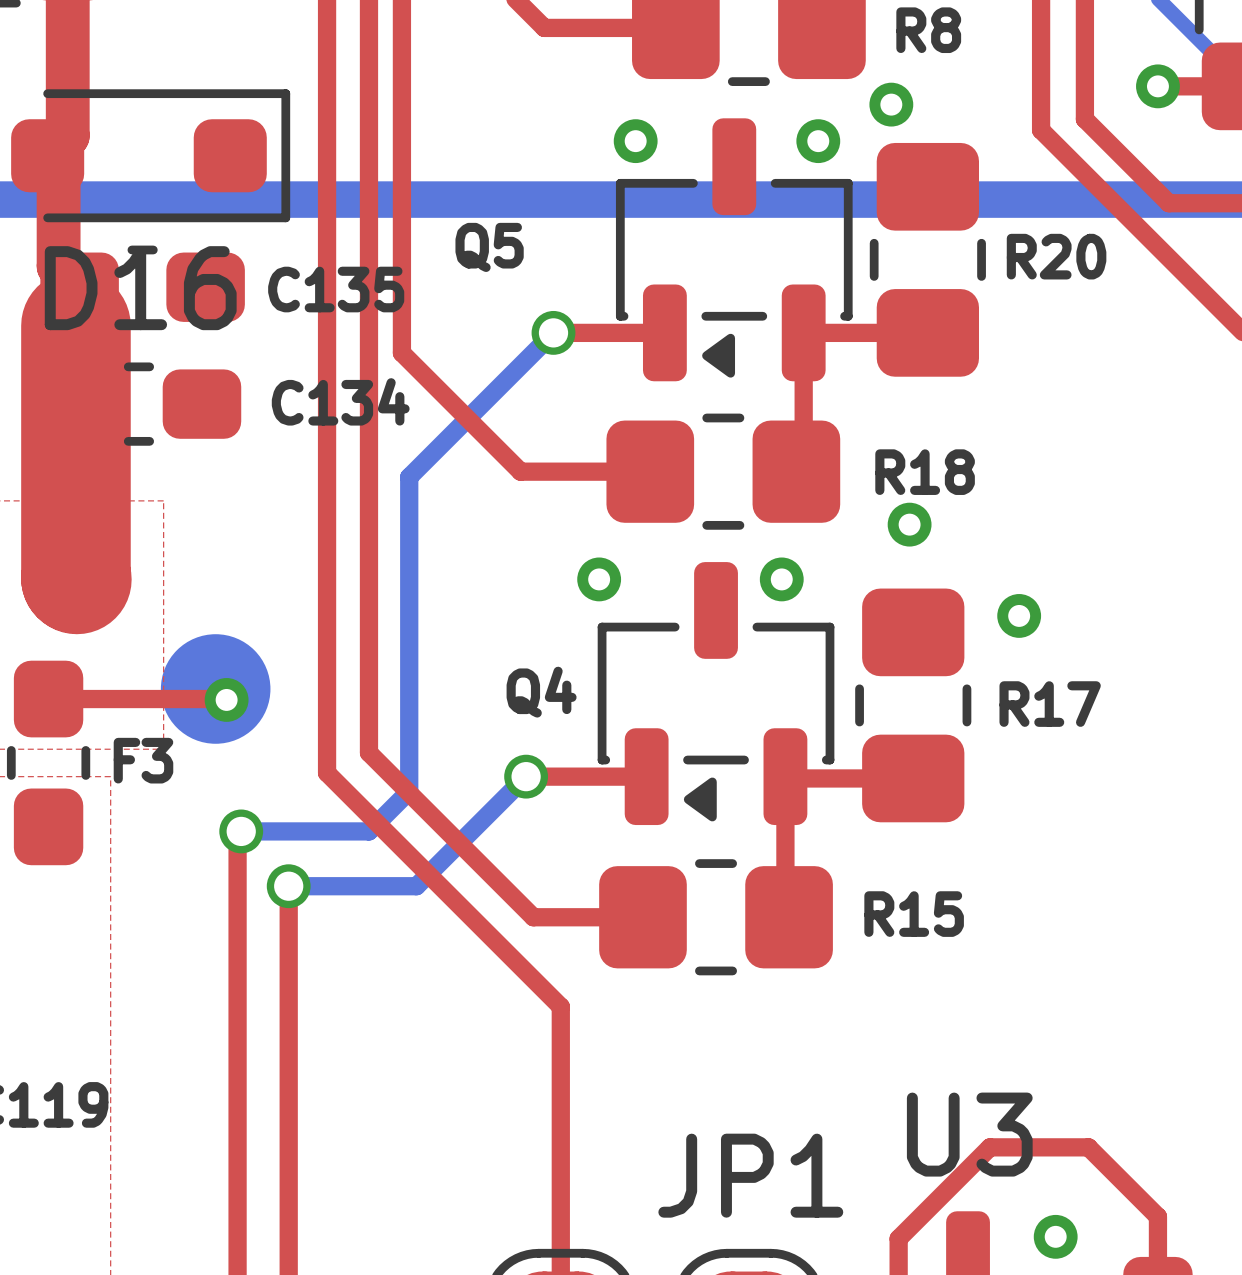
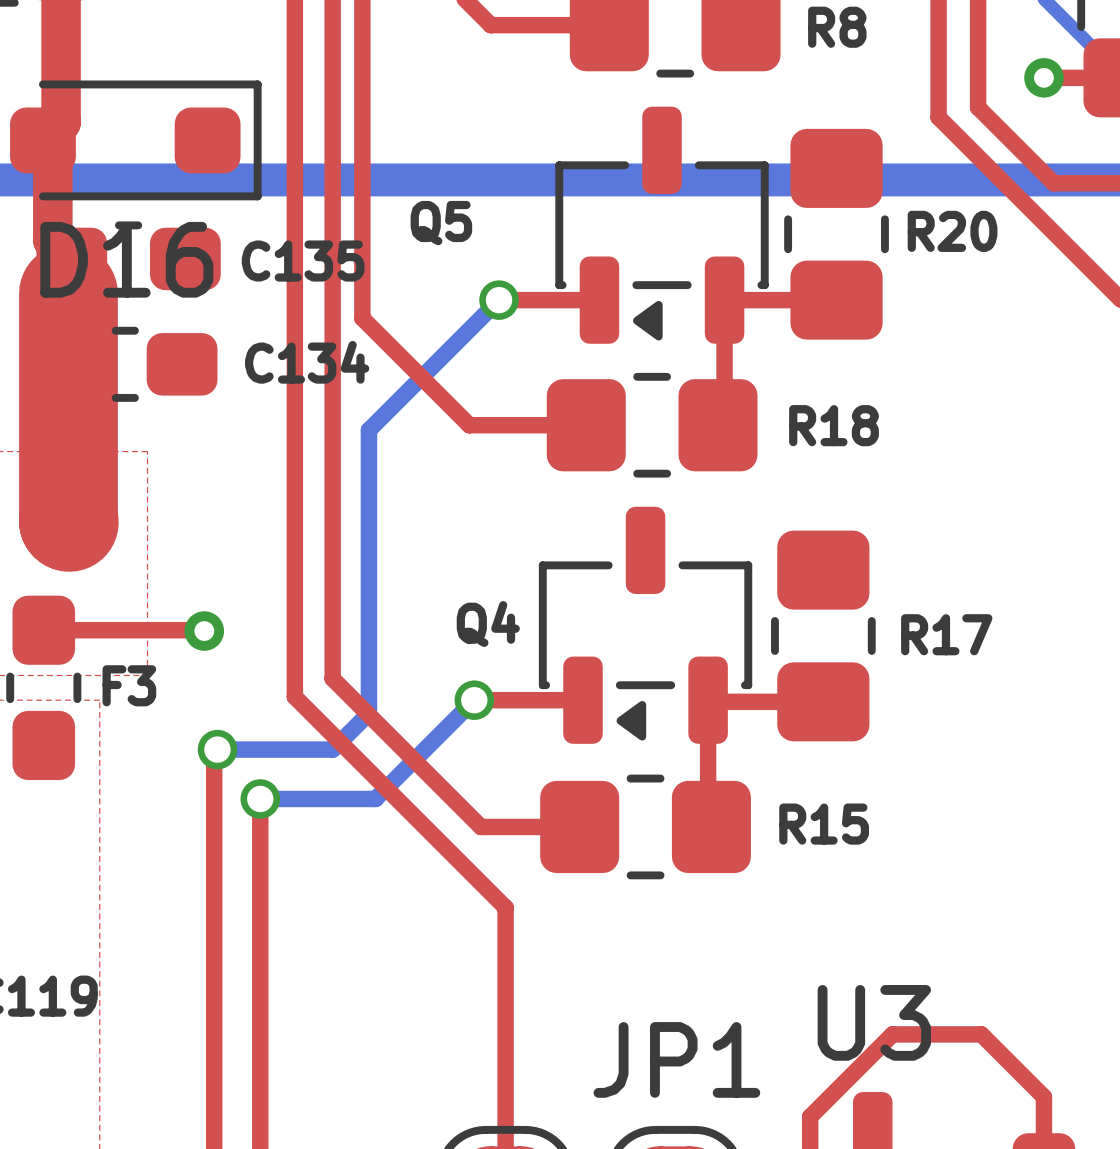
via: (891, 104) -> none
via: (635, 141) -> none
via: (818, 141) -> none
via: (909, 524) -> none
via: (599, 579) -> none
via: (781, 579) -> none
via: (1019, 615) -> none
part: (215, 688) -> none
via: (1055, 1236) -> none

